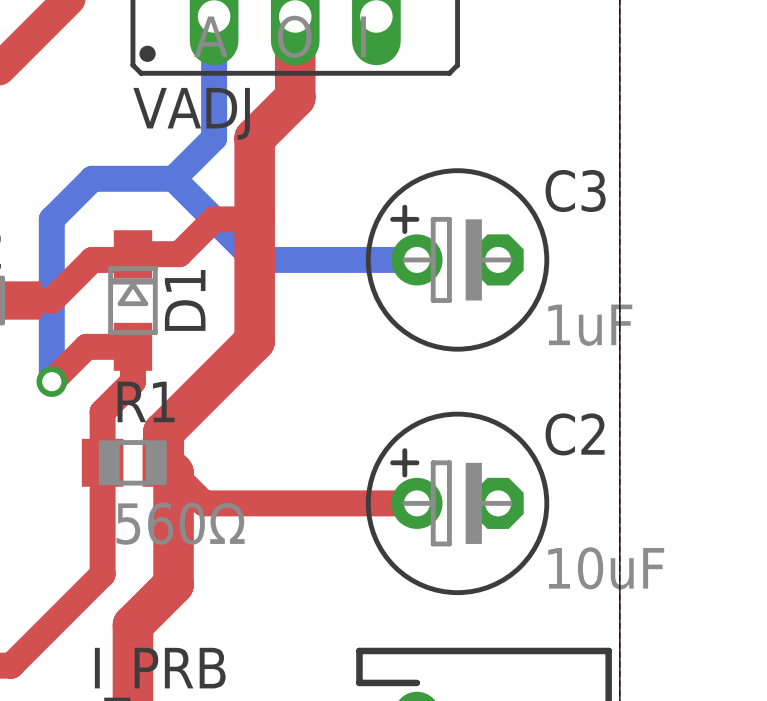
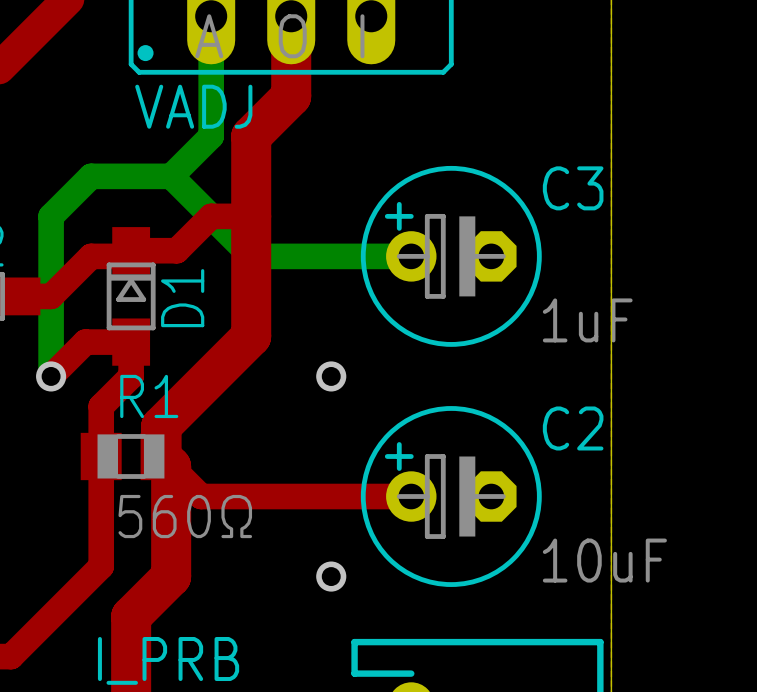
via: none -> (331, 376)
via: none -> (331, 576)

